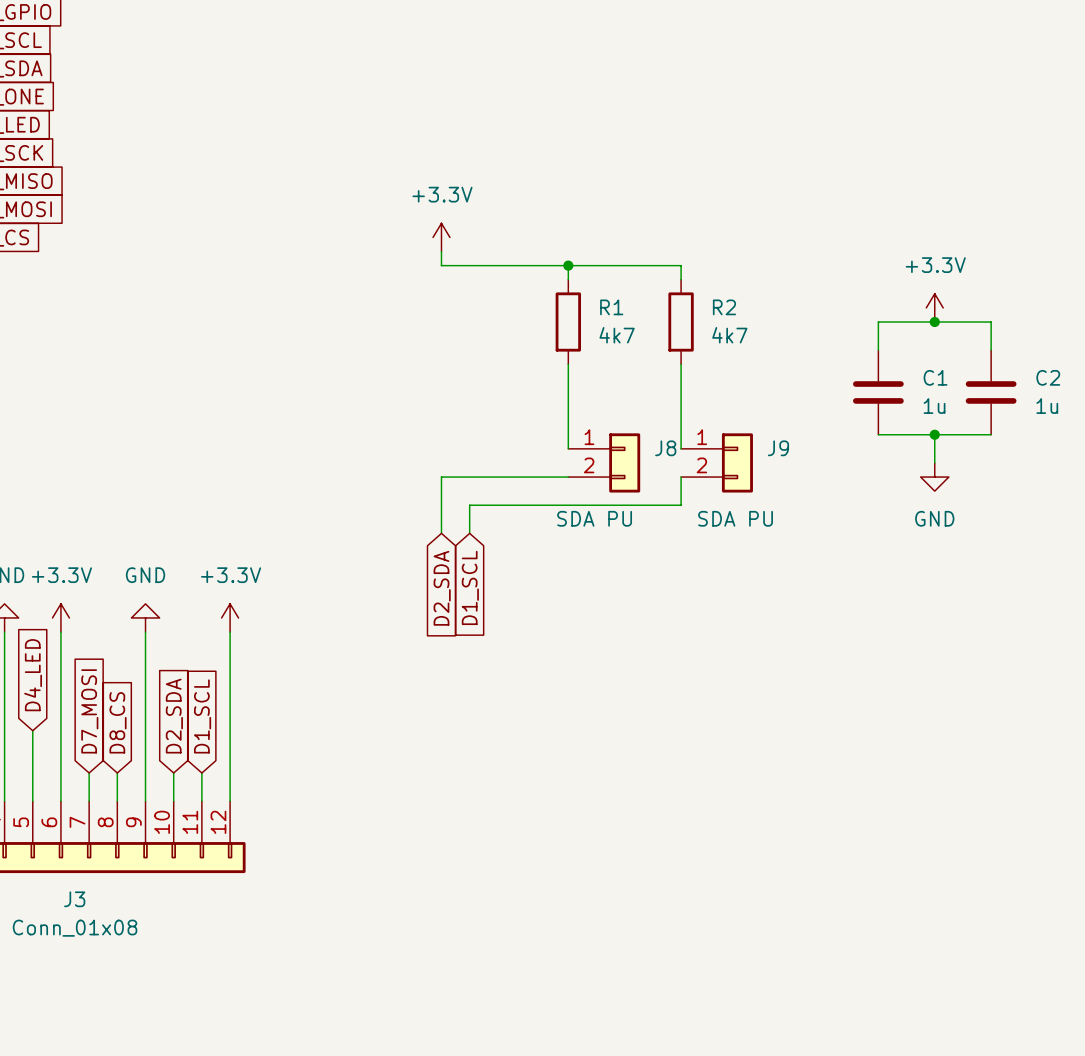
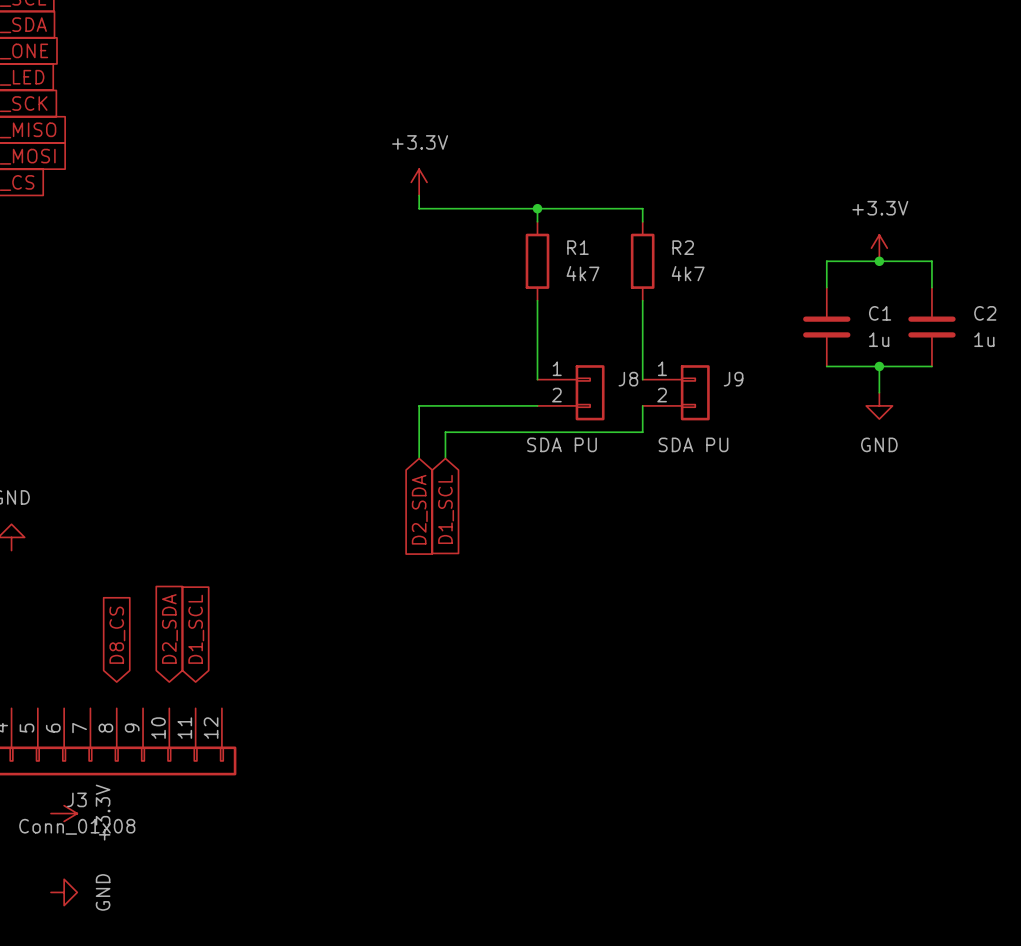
power symbol: +3.3V (60, 617) -> none
power symbol: GND (145, 617) -> none
power symbol: +3.3V (230, 617) -> none
wire: (4, 632) (4, 801) -> none
wire: (60, 632) (60, 801) -> none
wire: (145, 632) (145, 801) -> none
wire: (230, 632) (230, 801) -> none
global label: D4_LED (33, 675) -> none
global label: D7_MOSI (89, 711) -> none
wire: (32, 730) (32, 801) -> none
wire: (89, 773) (89, 801) -> none
wire: (117, 773) (117, 801) -> none
wire: (173, 773) (173, 801) -> none
wire: (201, 773) (201, 801) -> none
power symbol: none -> +3.3V (64, 813)
power symbol: none -> GND (64, 892)

